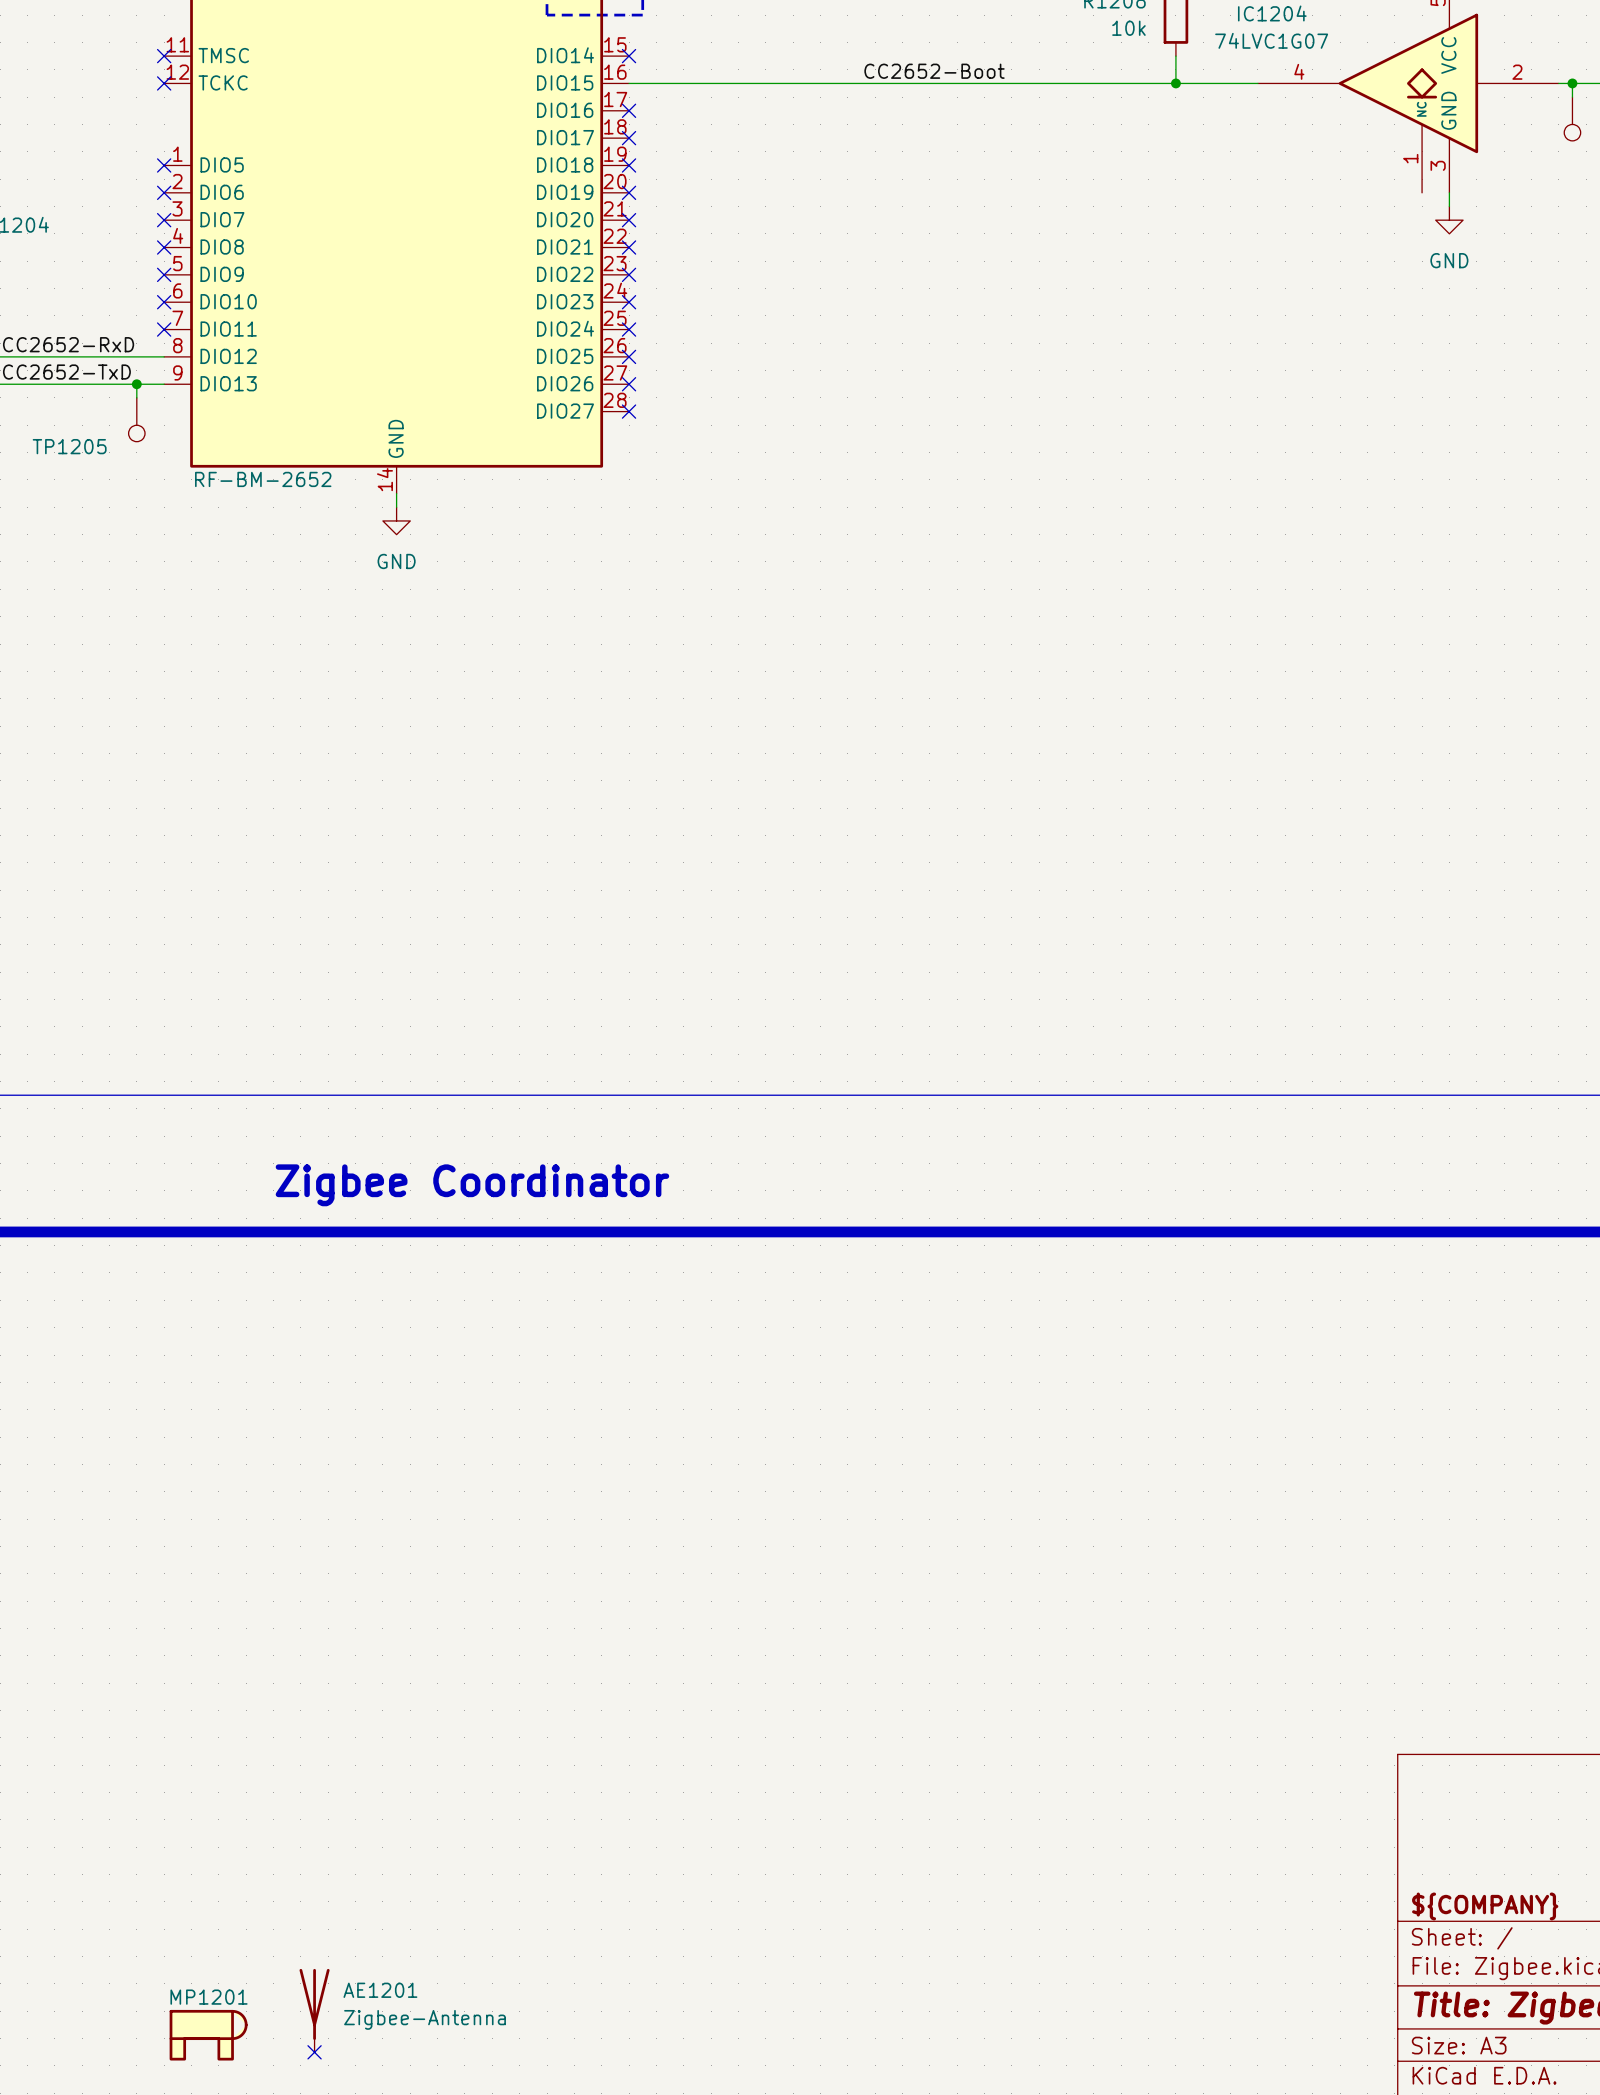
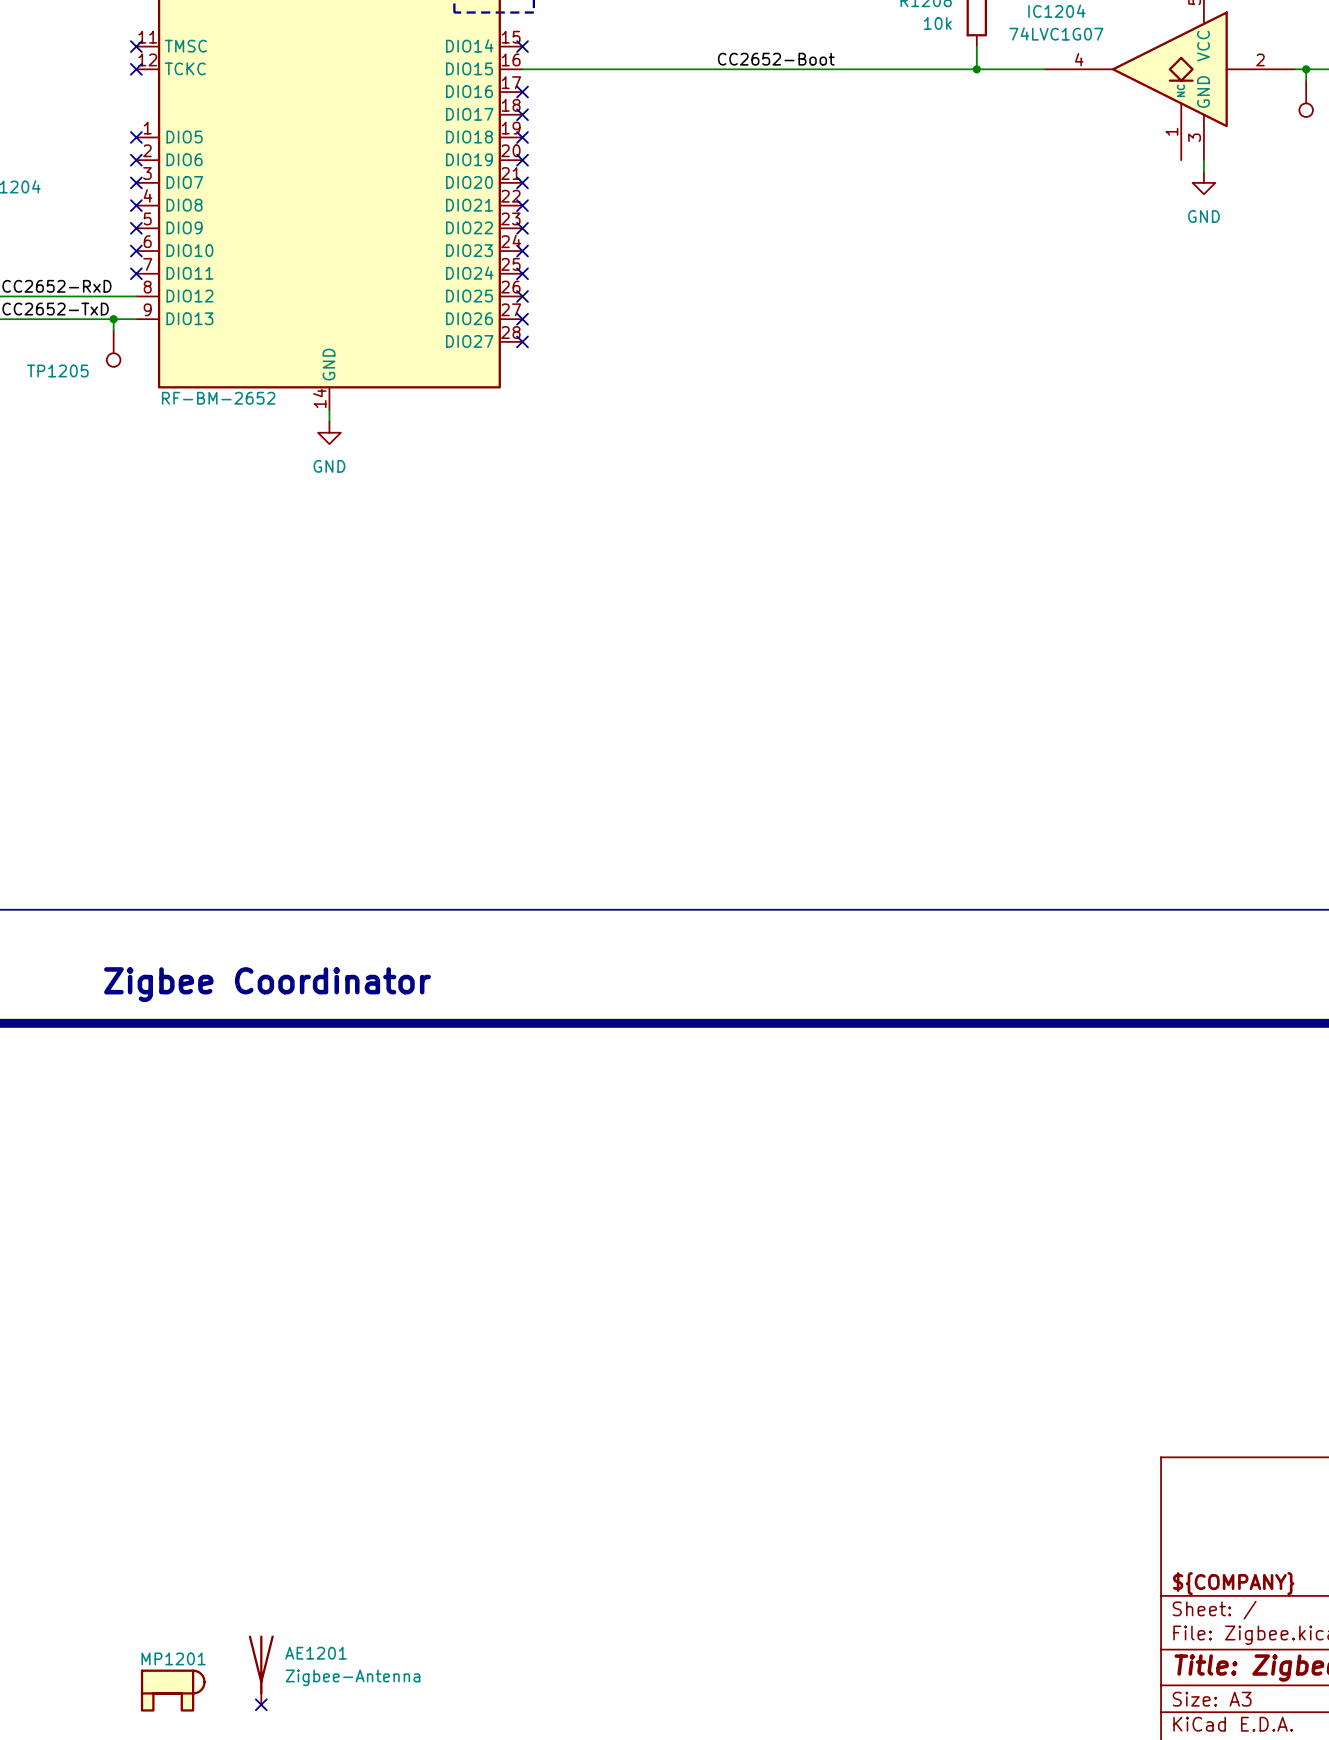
text position: Zigbee Coordinator (472, 1185) -> Zigbee Coordinator (267, 984)

